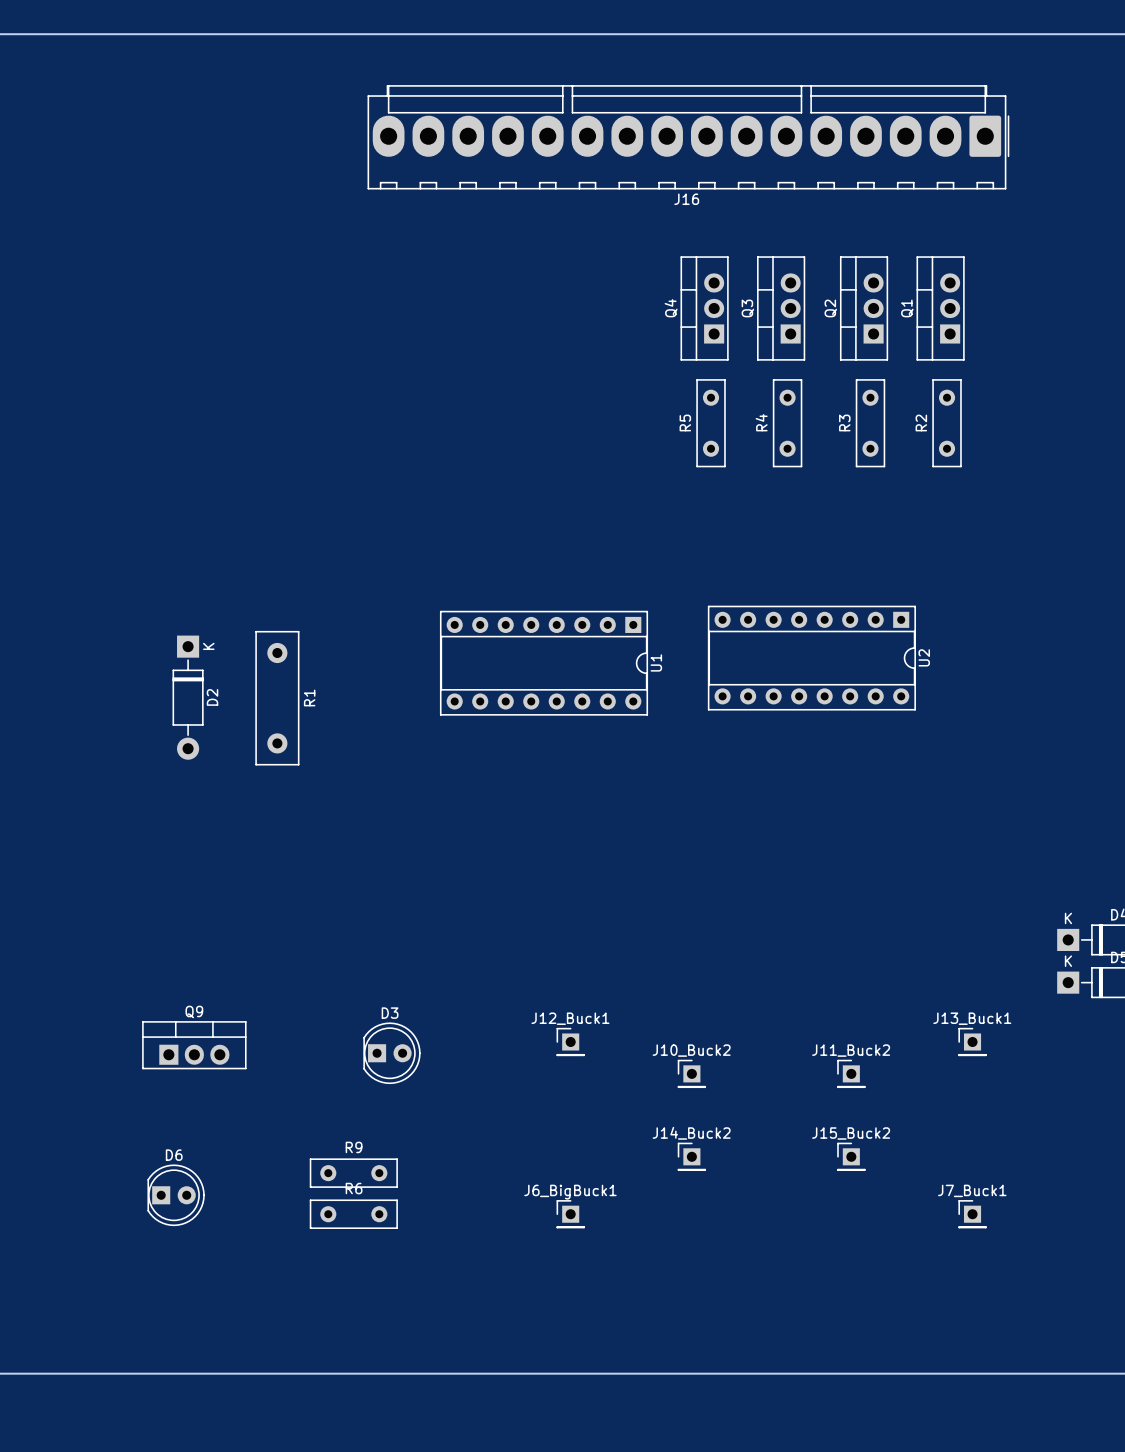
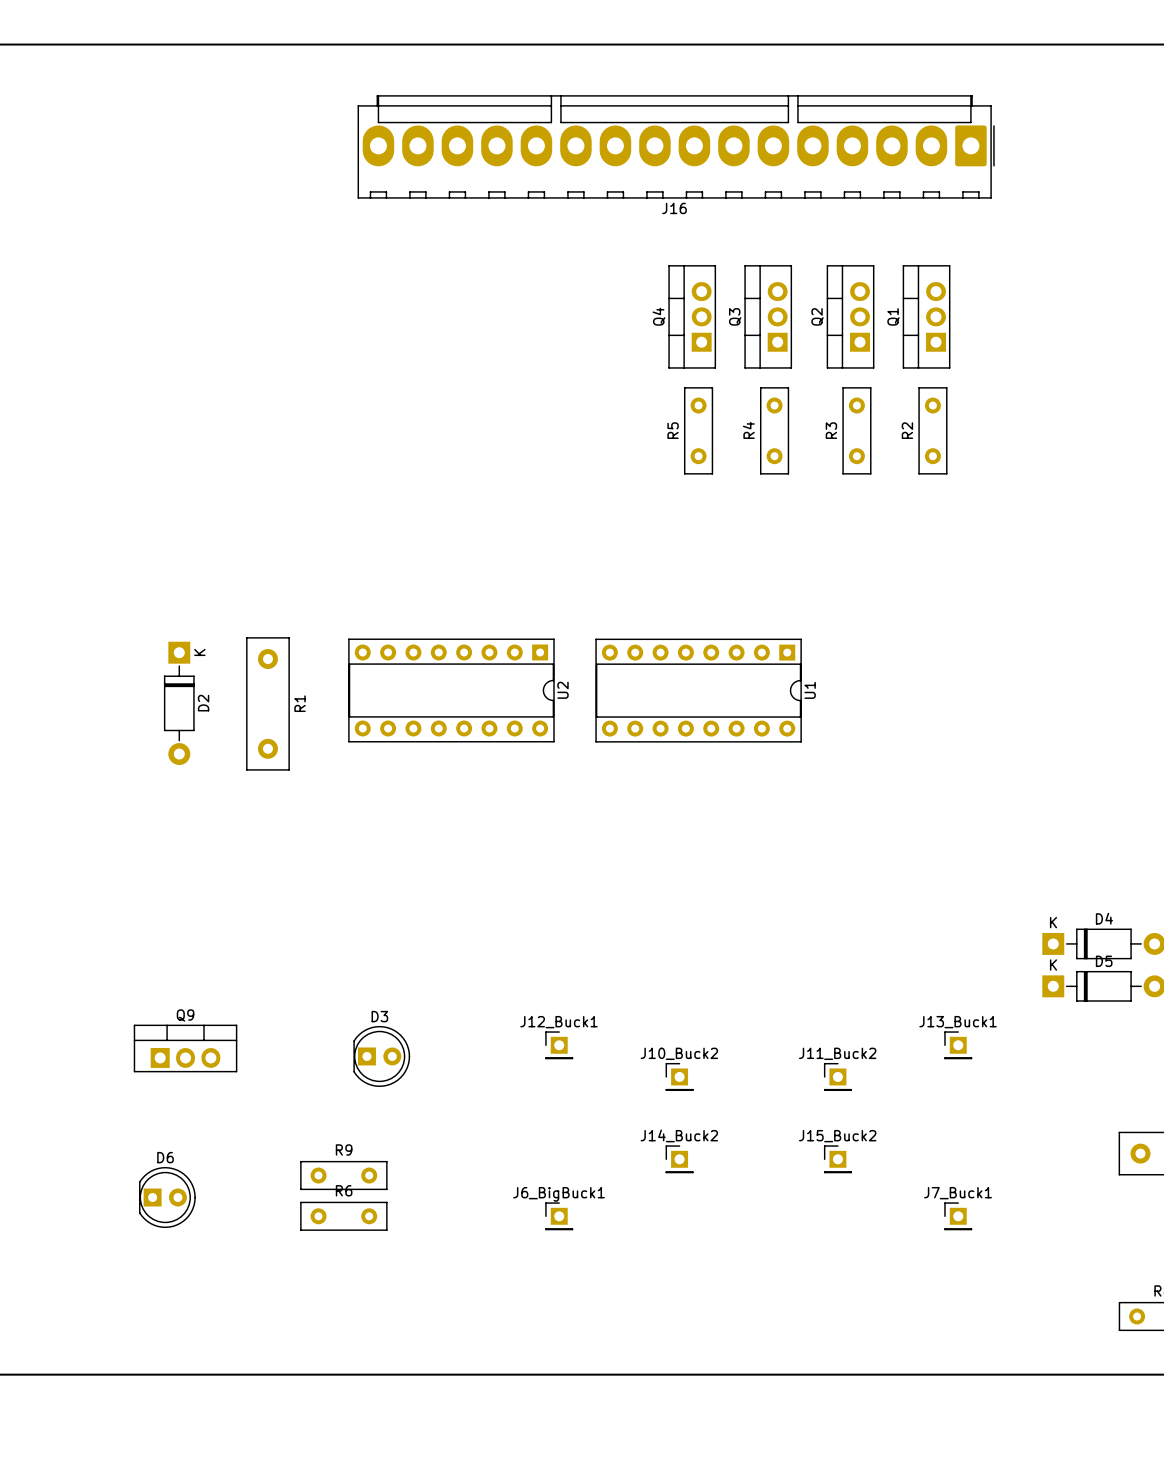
U2 position: (811, 658) -> (451, 690)
U1 position: (544, 663) -> (698, 690)

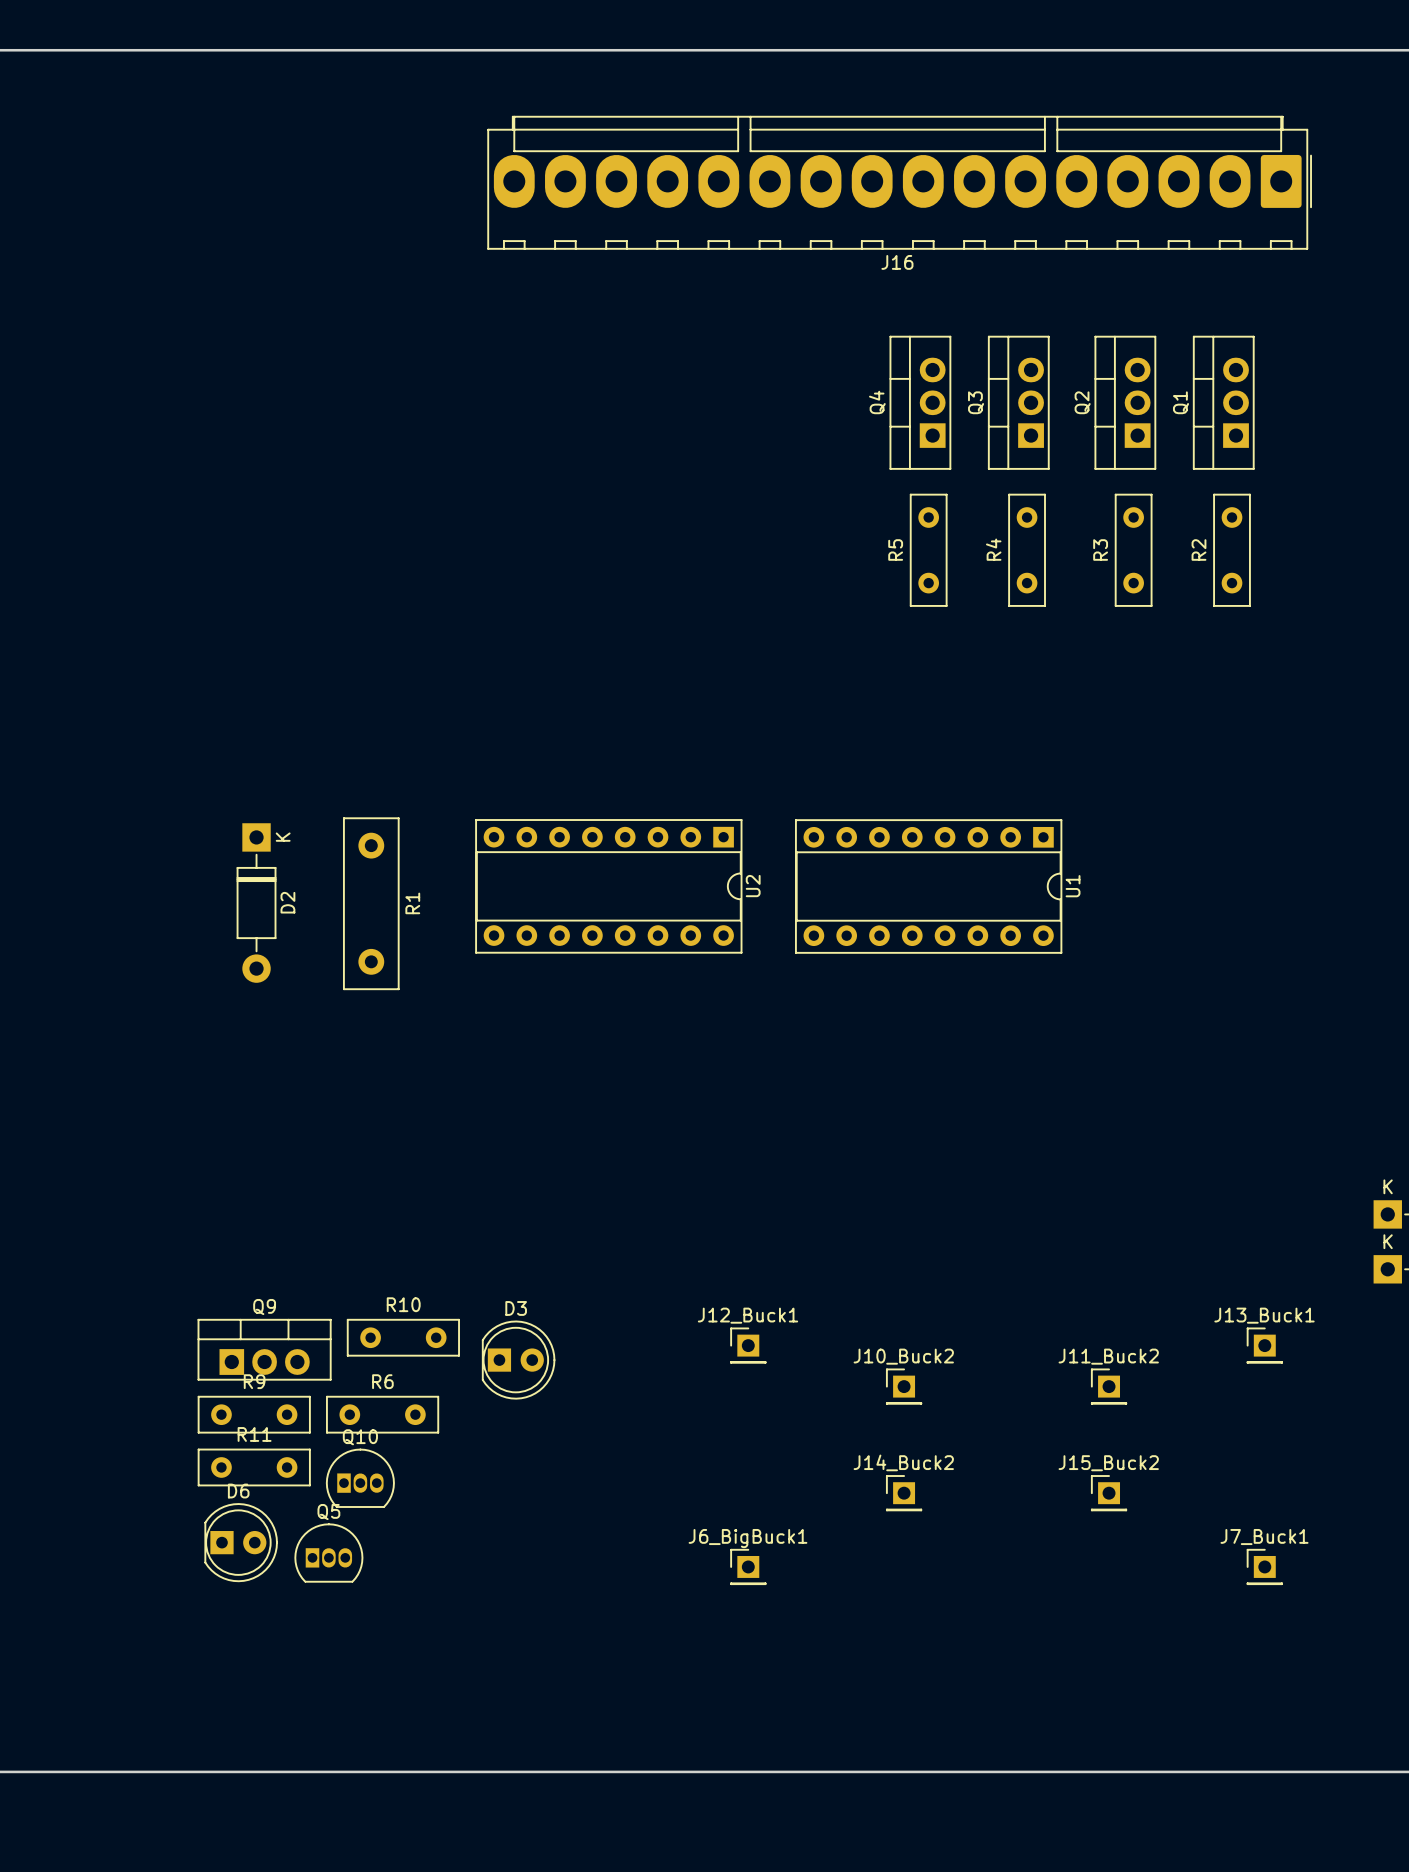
R10: none -> (403, 1337)
R11: none -> (254, 1467)
Q10: none -> (360, 1478)
R9 position: (343, 1175) -> (254, 1414)
Q5: none -> (328, 1553)
R6 position: (343, 1216) -> (382, 1414)

